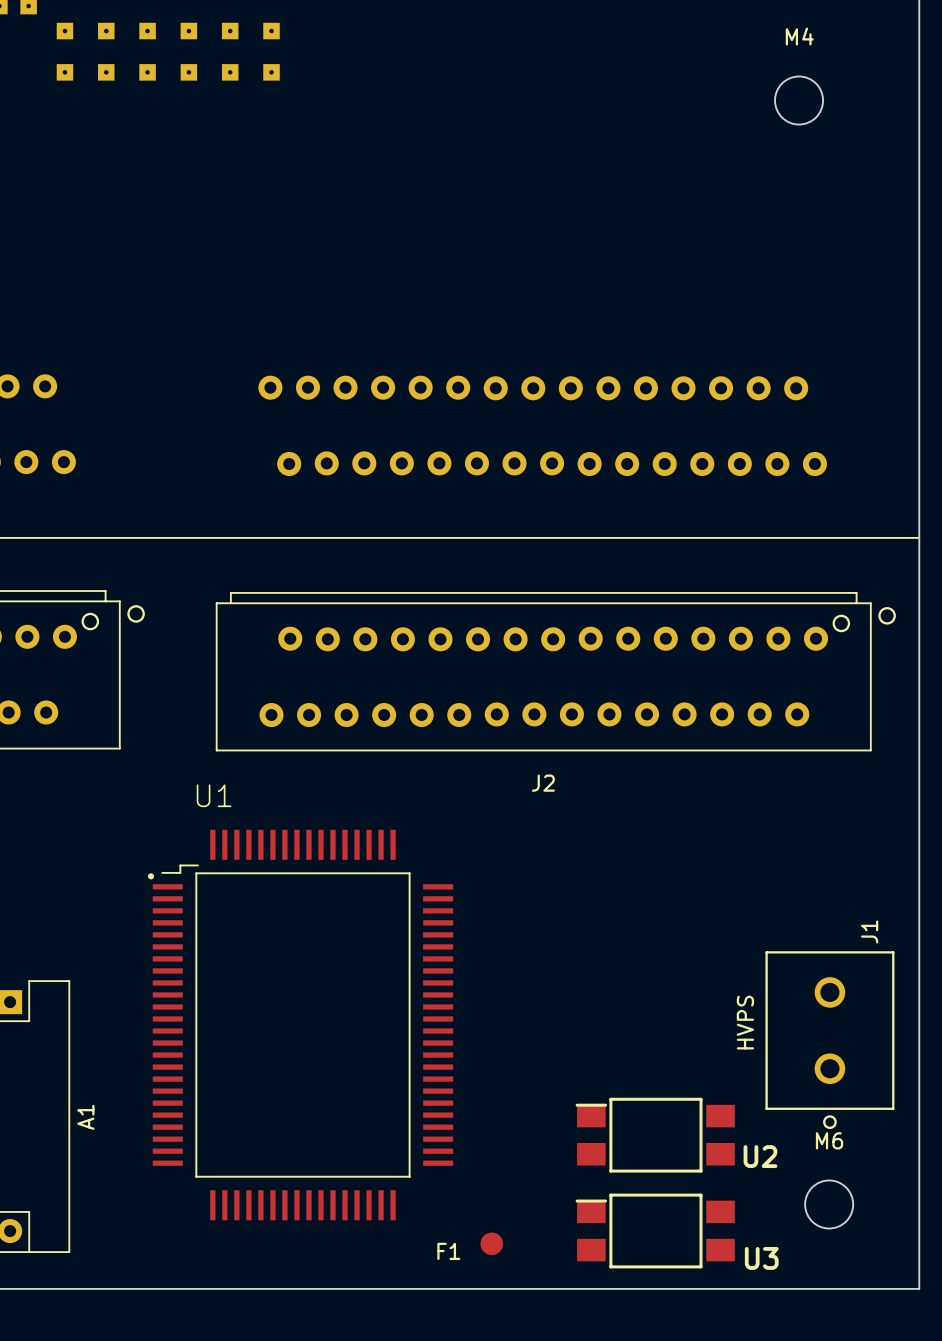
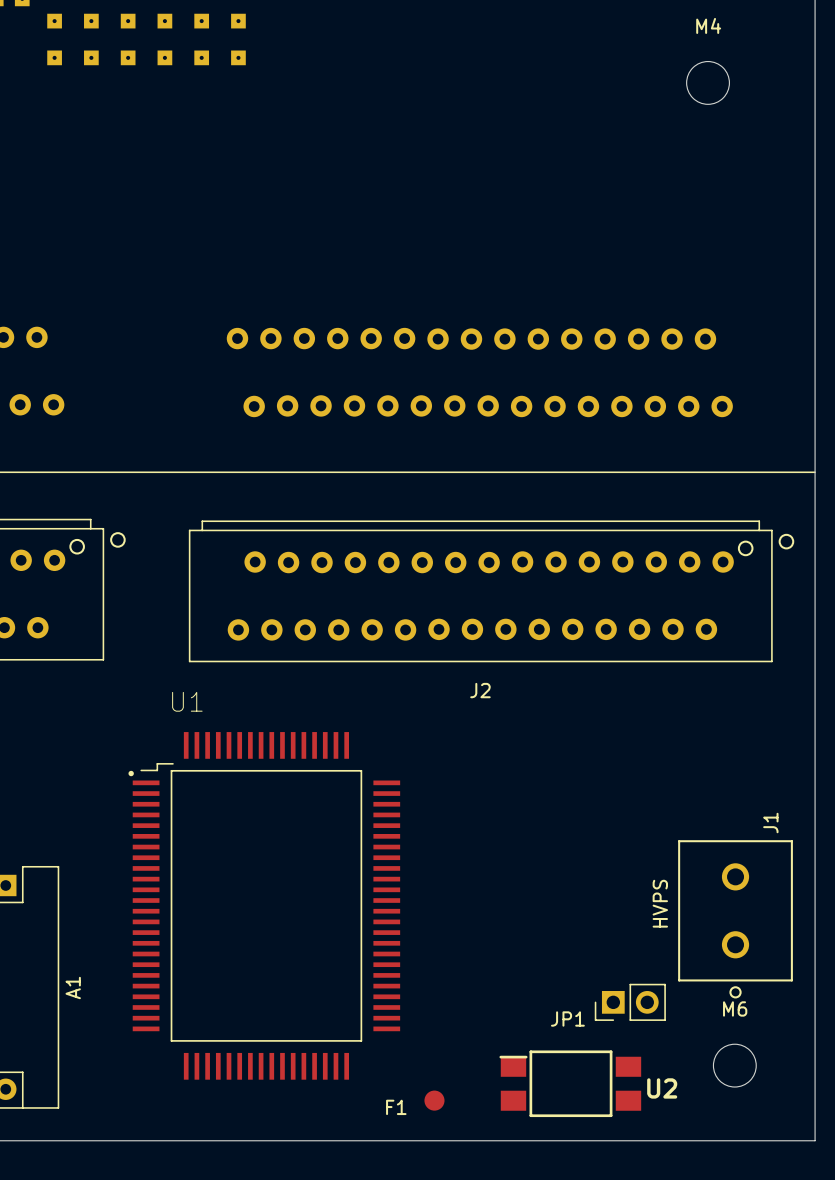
JP1: none -> (630, 1002)
U2 position: (655, 1135) -> (570, 1083)
U2 name position: U2 (760, 1156) -> U2 (662, 1088)
U3: (655, 1231) -> none

